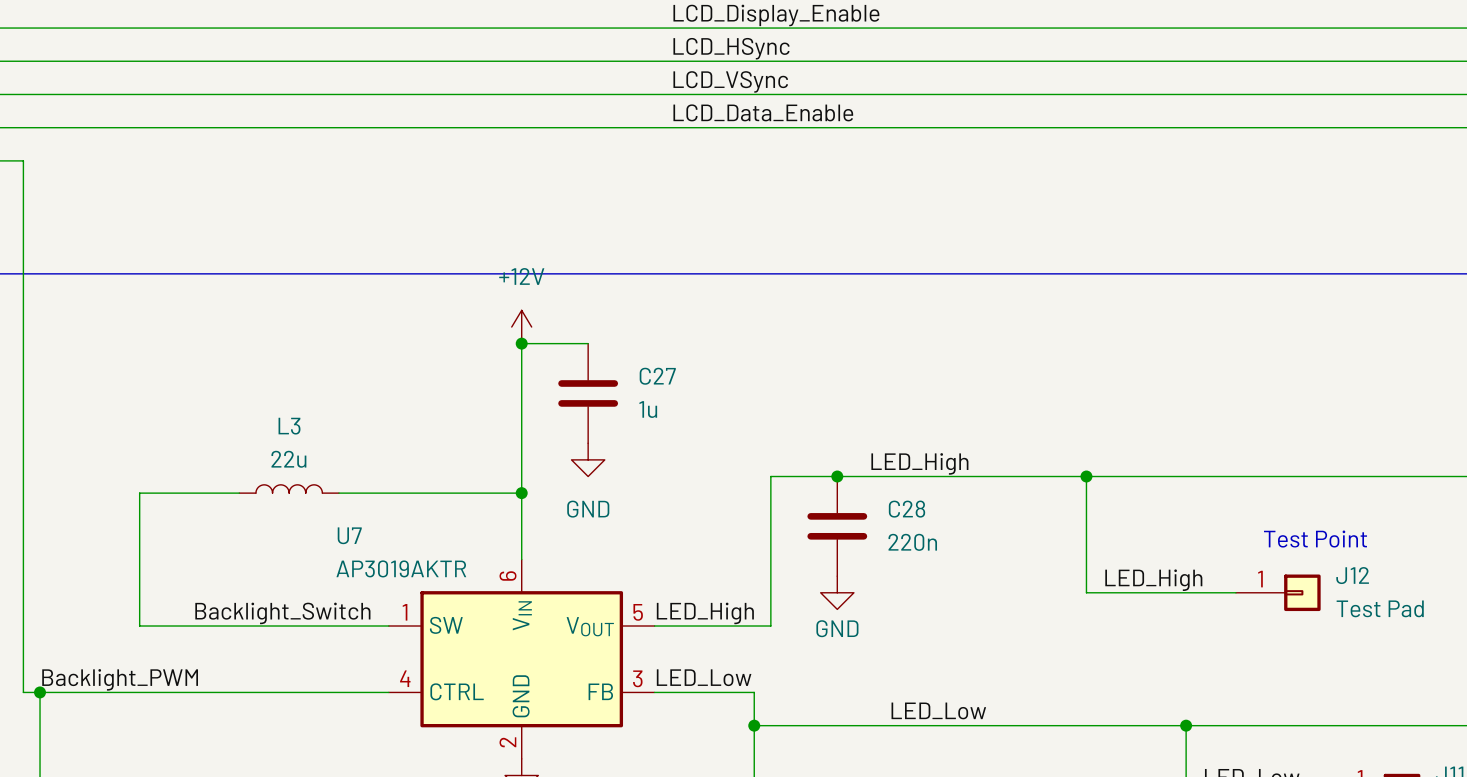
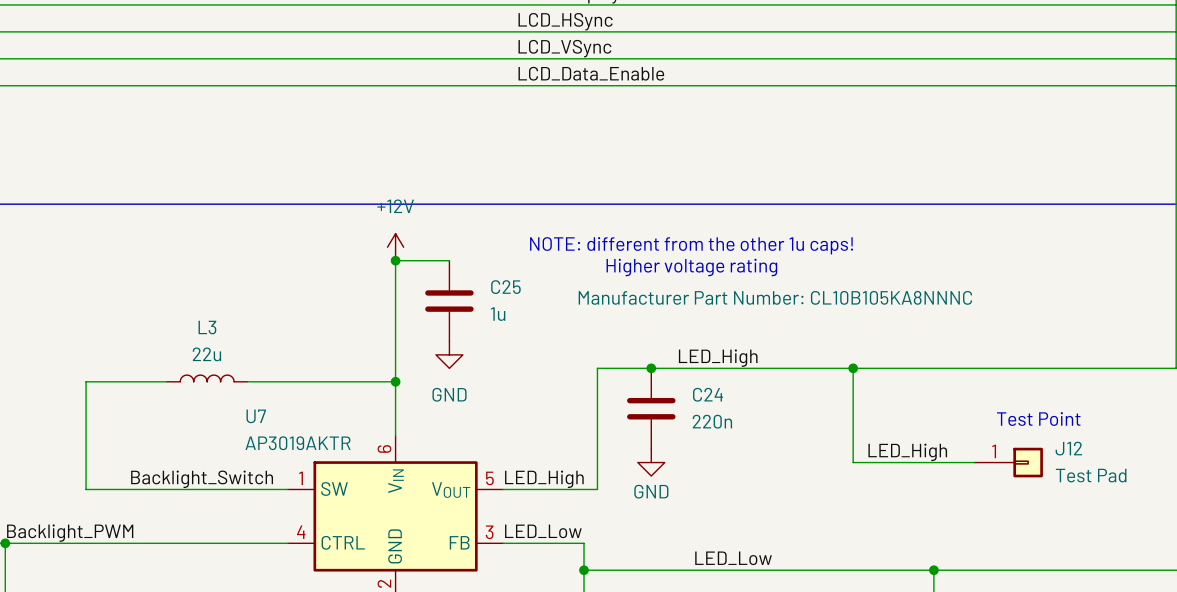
text: none -> NOTE: different from the other 1u caps! (691, 245)
text: none -> Higher voltage rating (691, 267)
C27 name: C27 (657, 376) -> C25 (505, 287)
C27 text: none -> Manufacturer Part Number: CL10B105KA8NNNC (775, 297)
C28 name: C28 (907, 509) -> C24 (708, 394)

